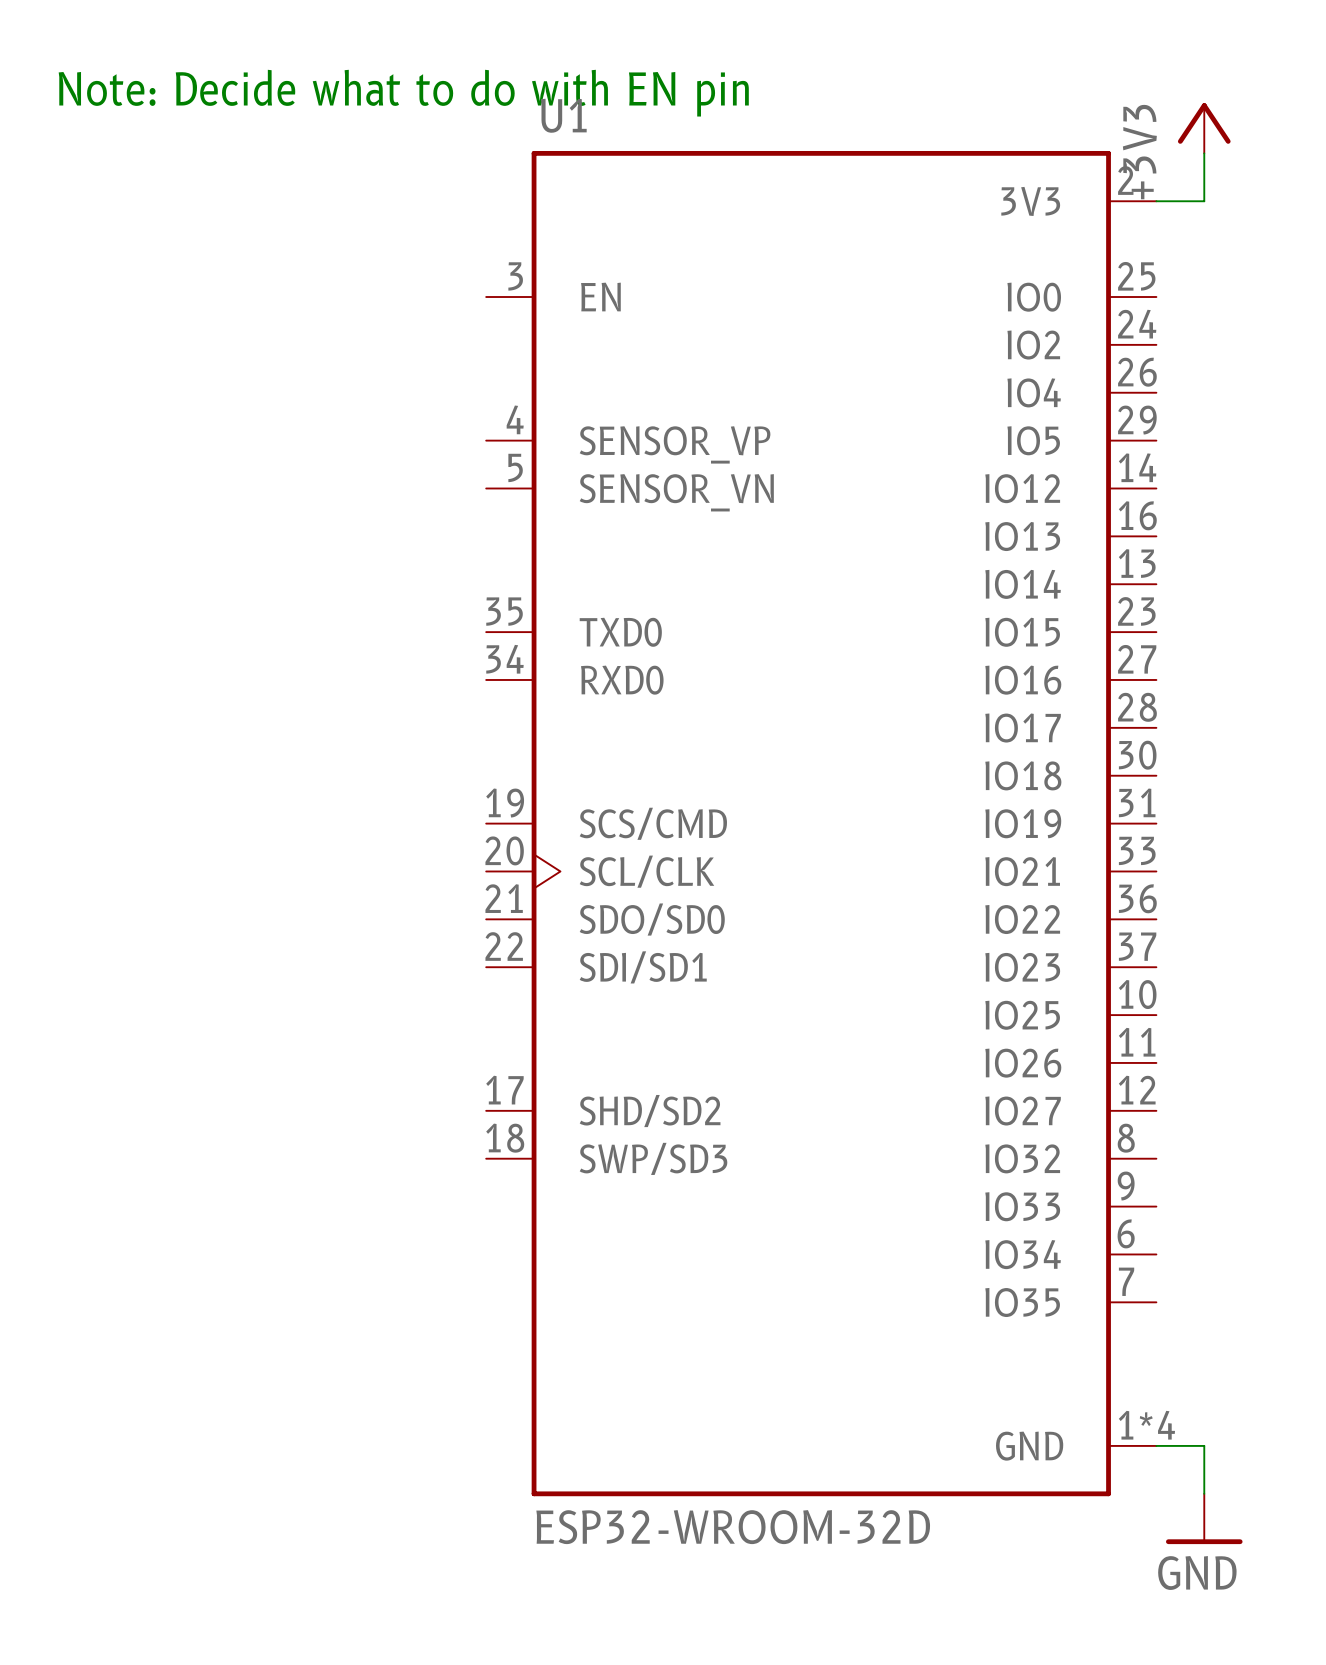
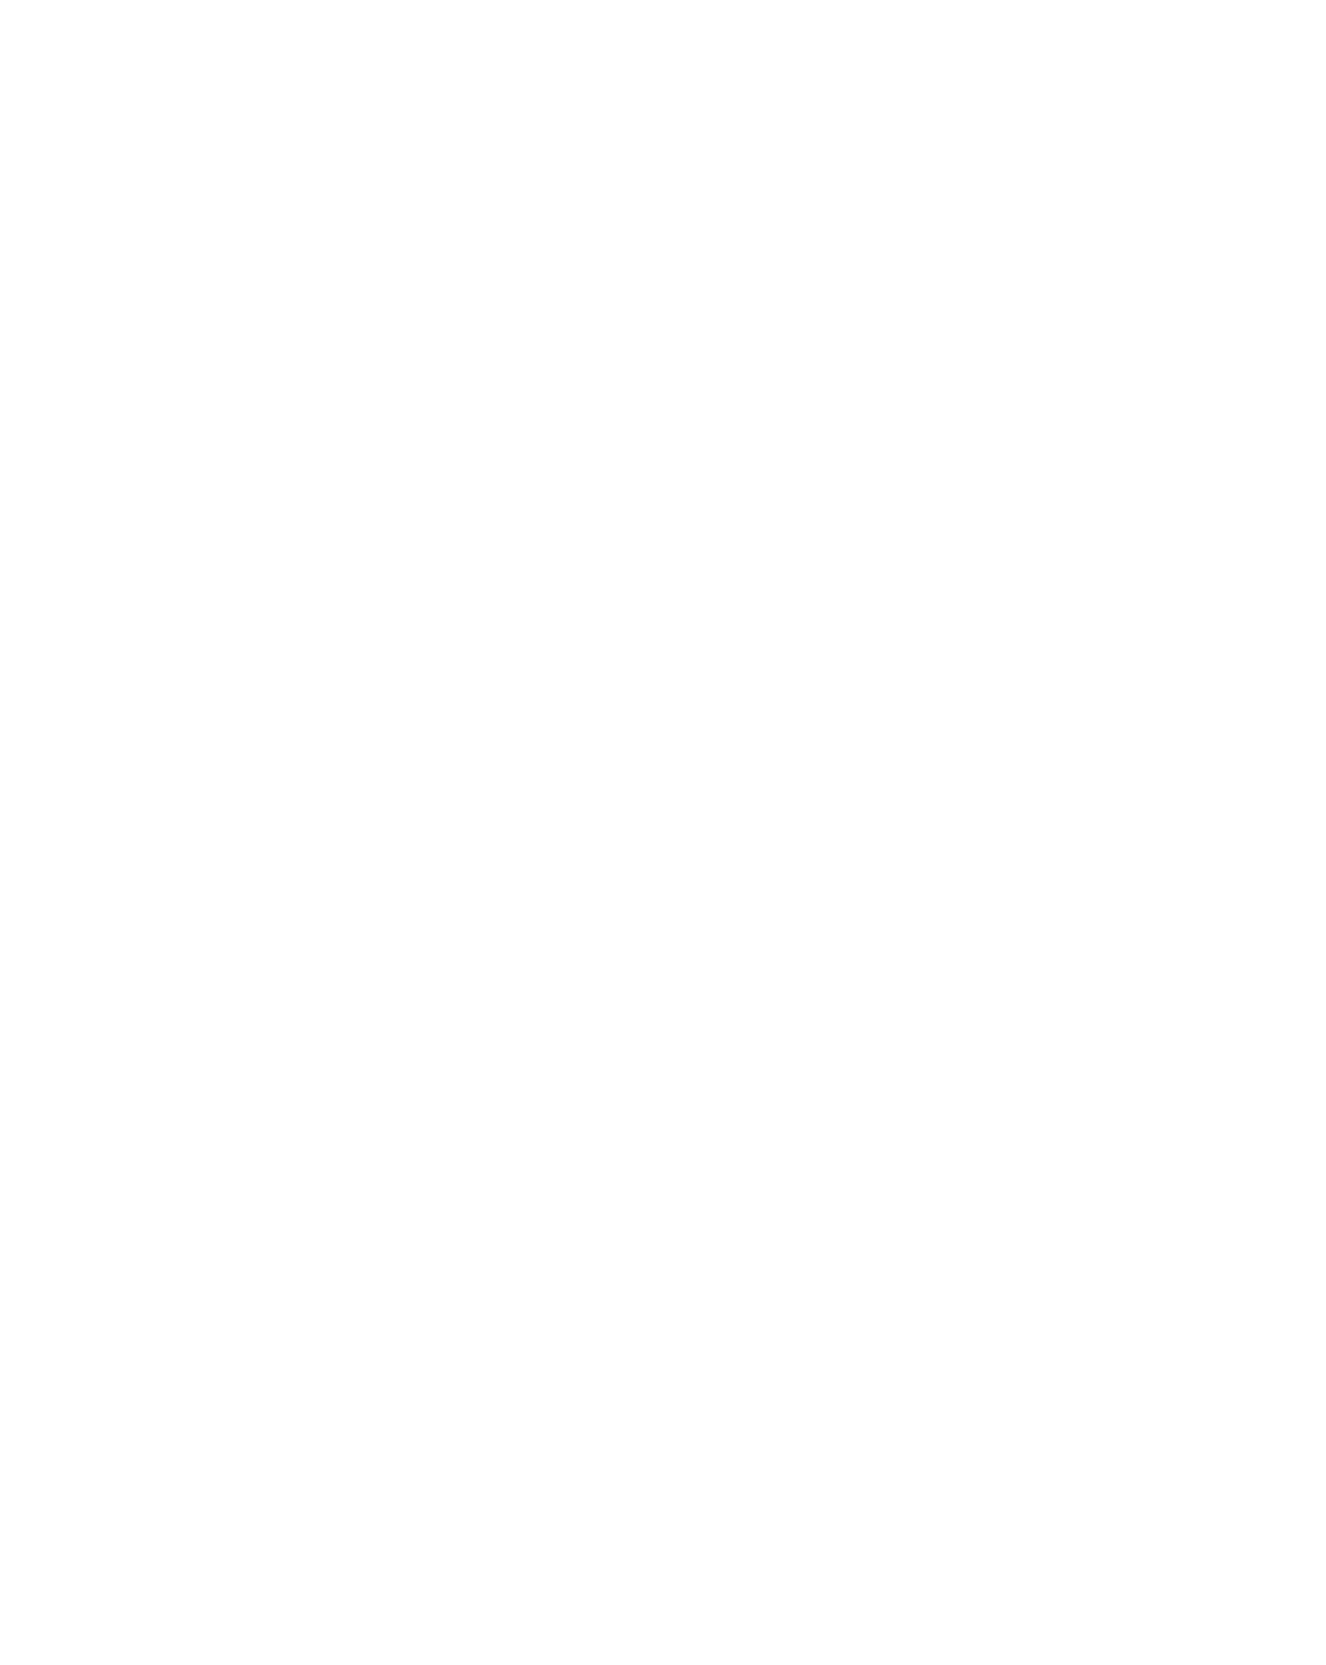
text: Note: Decide what to do with EN pin (403, 93) -> none
power symbol: +3V3 (1204, 128) -> none
wire: (1204, 153) (1204, 201) (1156, 201) -> none
U1: ESP32-WROOM-32D (821, 823) -> none
wire: (1156, 1445) (1204, 1445) (1204, 1493) -> none
power symbol: GND (1204, 1518) -> none

